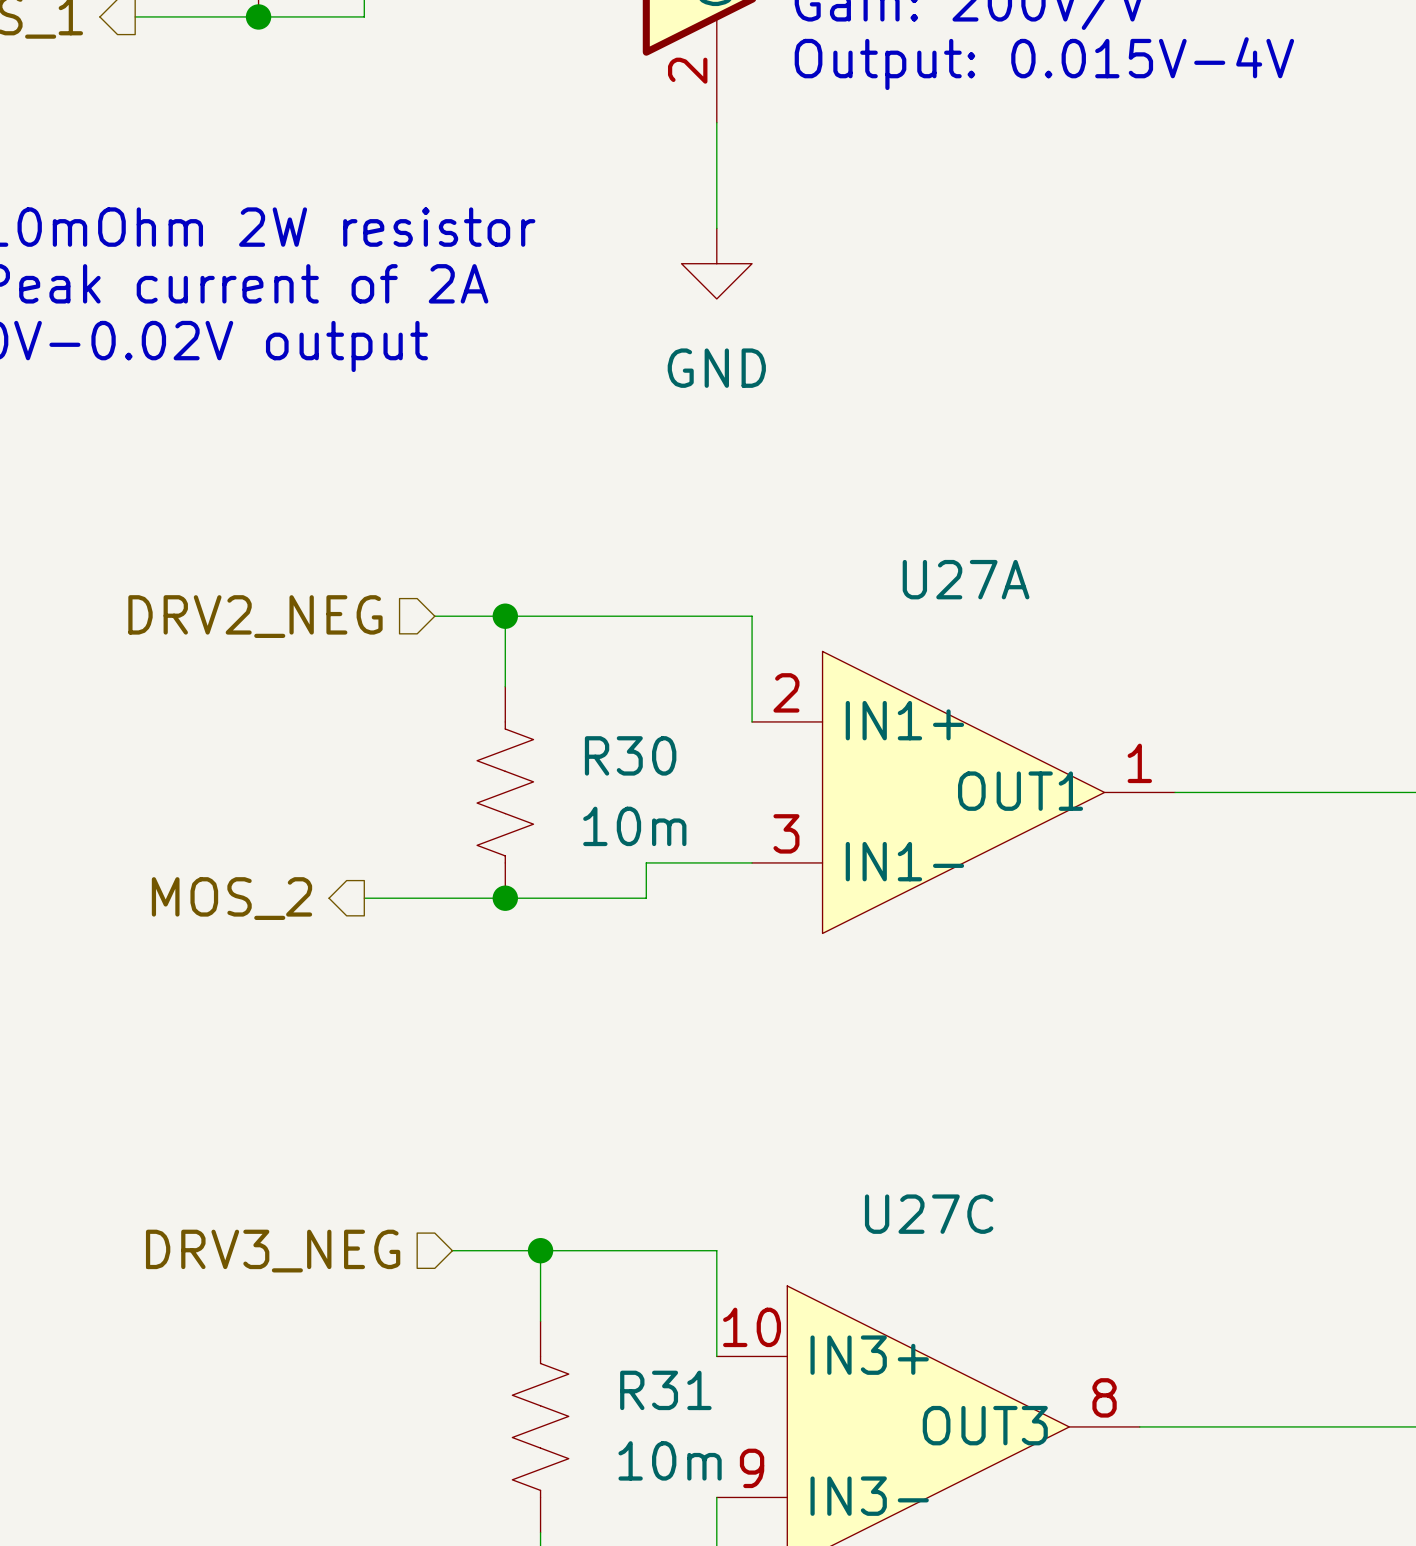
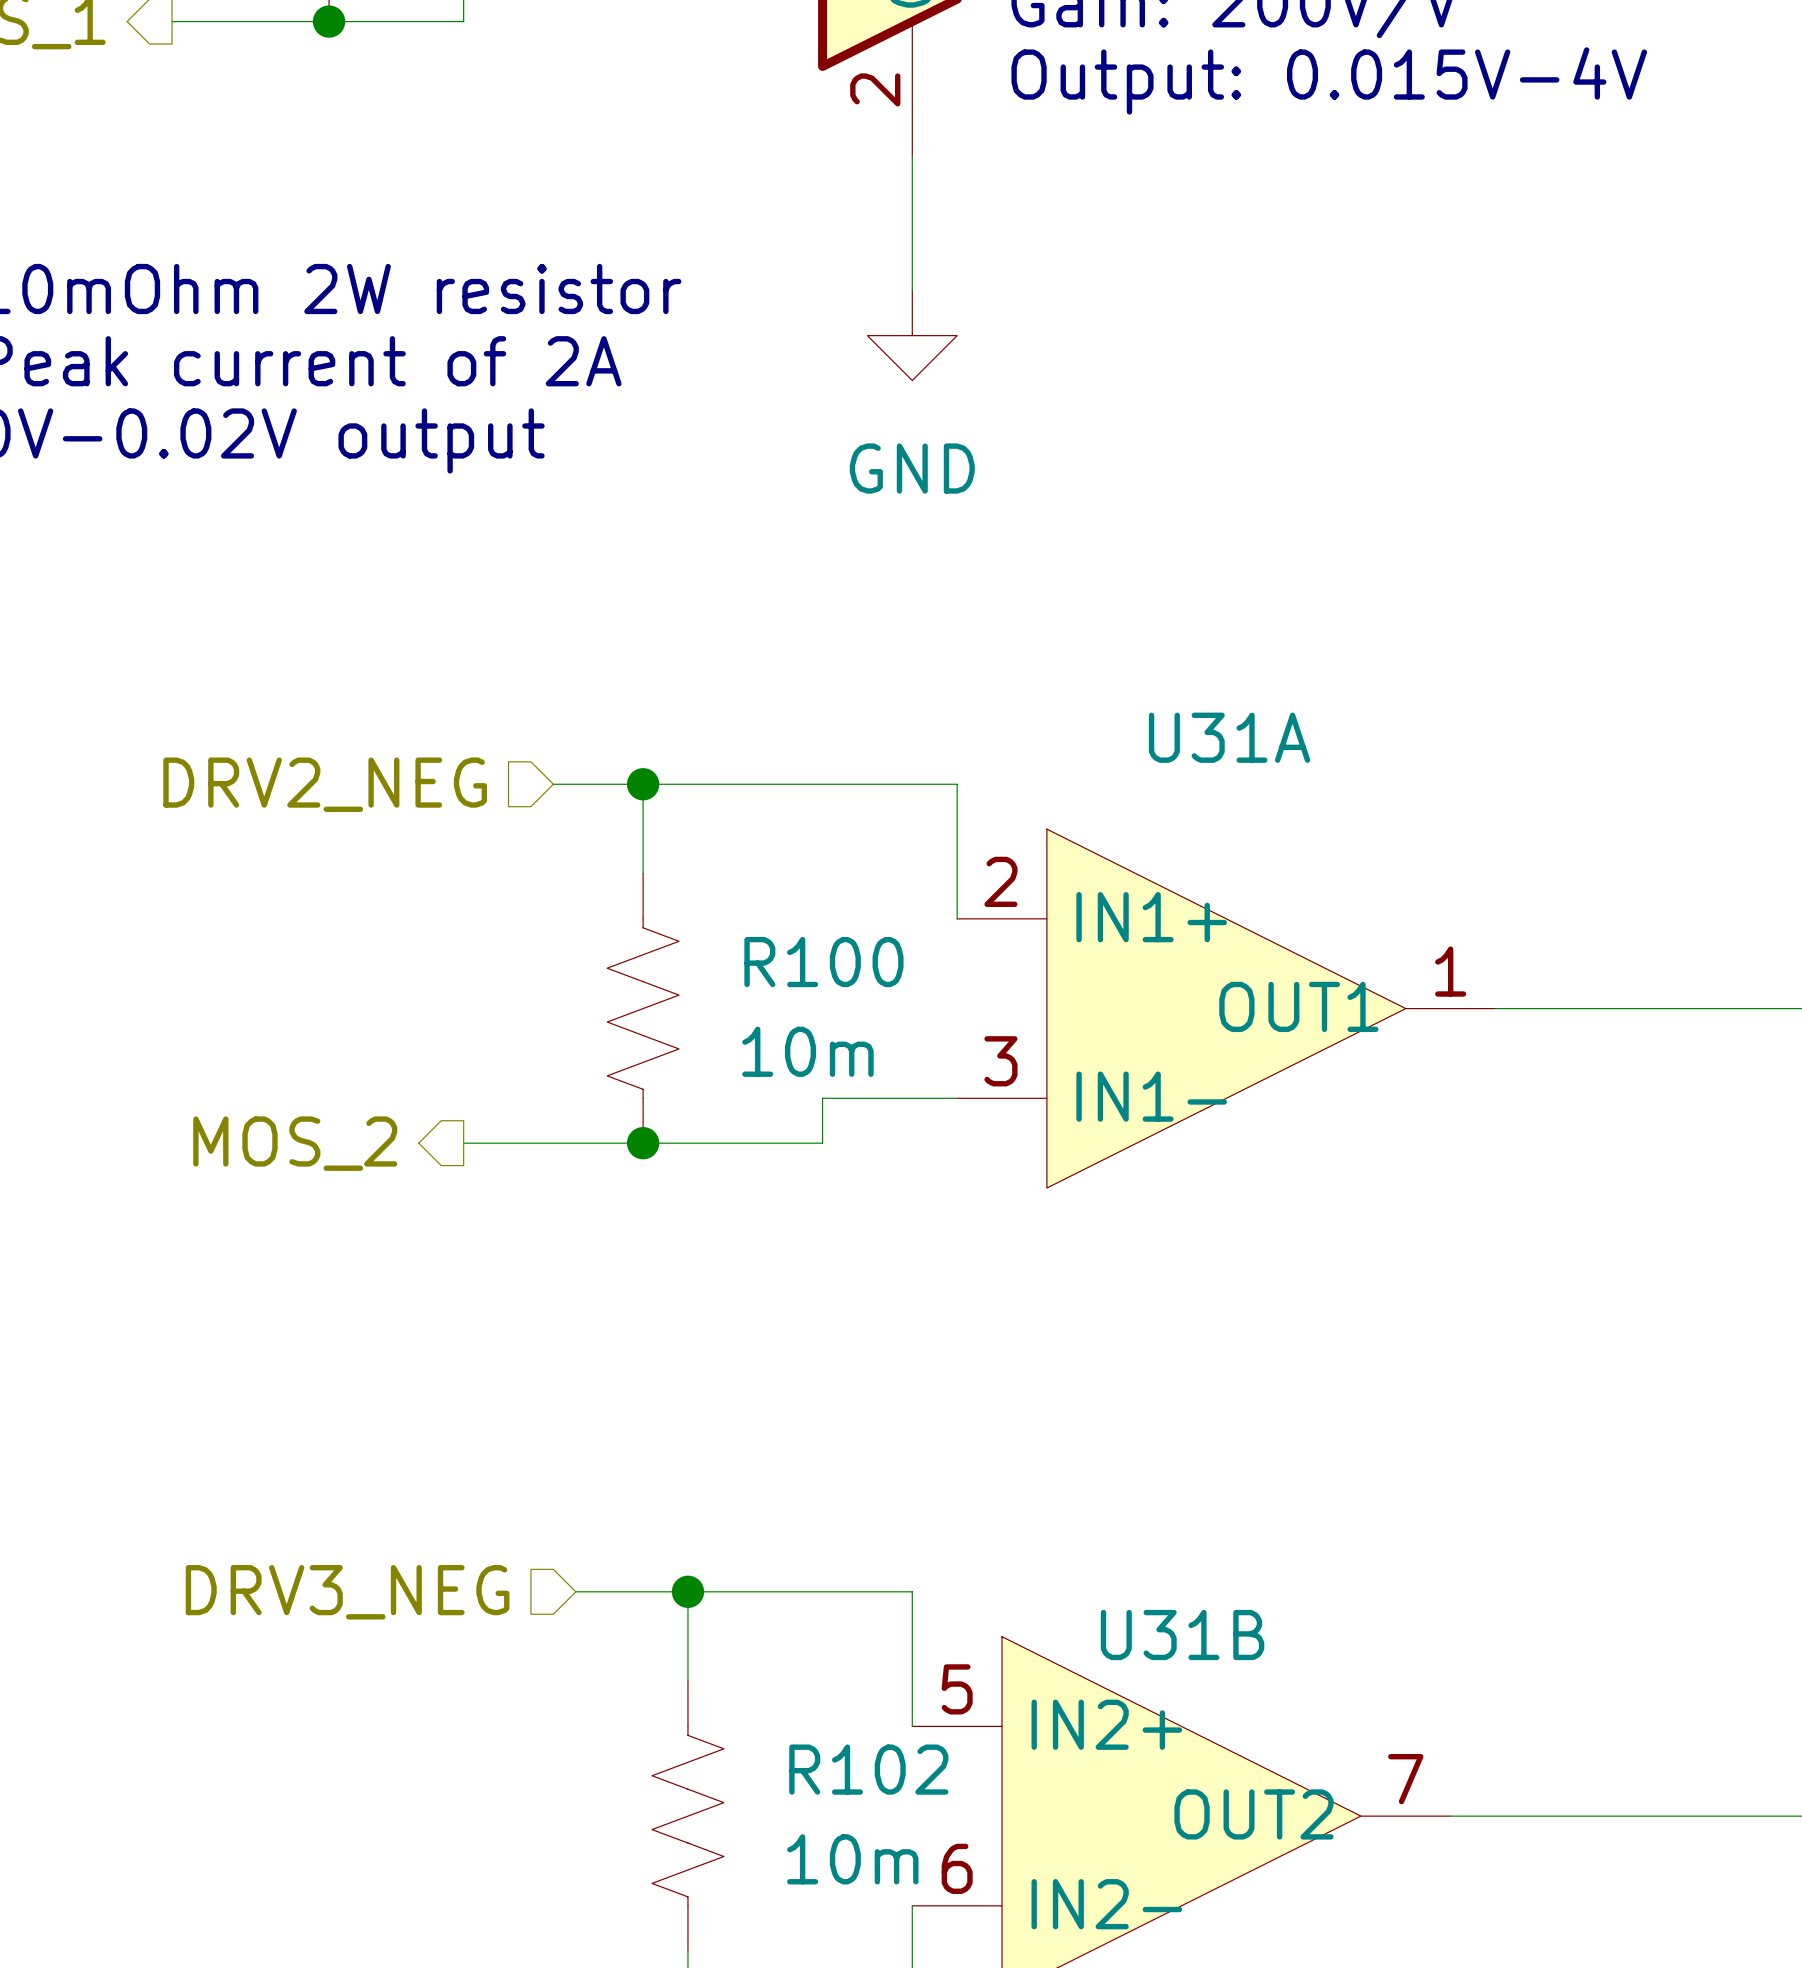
U27A name: U27A (966, 579) -> U31A (1229, 737)
R30 name: R30 (630, 755) -> R100 (823, 962)
U27C name: U27C (929, 1214) -> U31B (1182, 1635)
U27C pin number: 10 (752, 1327) -> 5 (957, 1689)
U27C pin name: IN3+ (869, 1355) -> IN2+ (1106, 1724)
R31 name: R31 (665, 1390) -> R102 (868, 1769)
U27C pin number: 8 (1104, 1397) -> 7 (1405, 1779)
U27C pin name: OUT3 (985, 1425) -> OUT2 (1253, 1814)
U27C pin number: 9 (752, 1468) -> 6 (957, 1868)
U27C pin name: IN3- (869, 1496) -> IN2- (1106, 1904)

